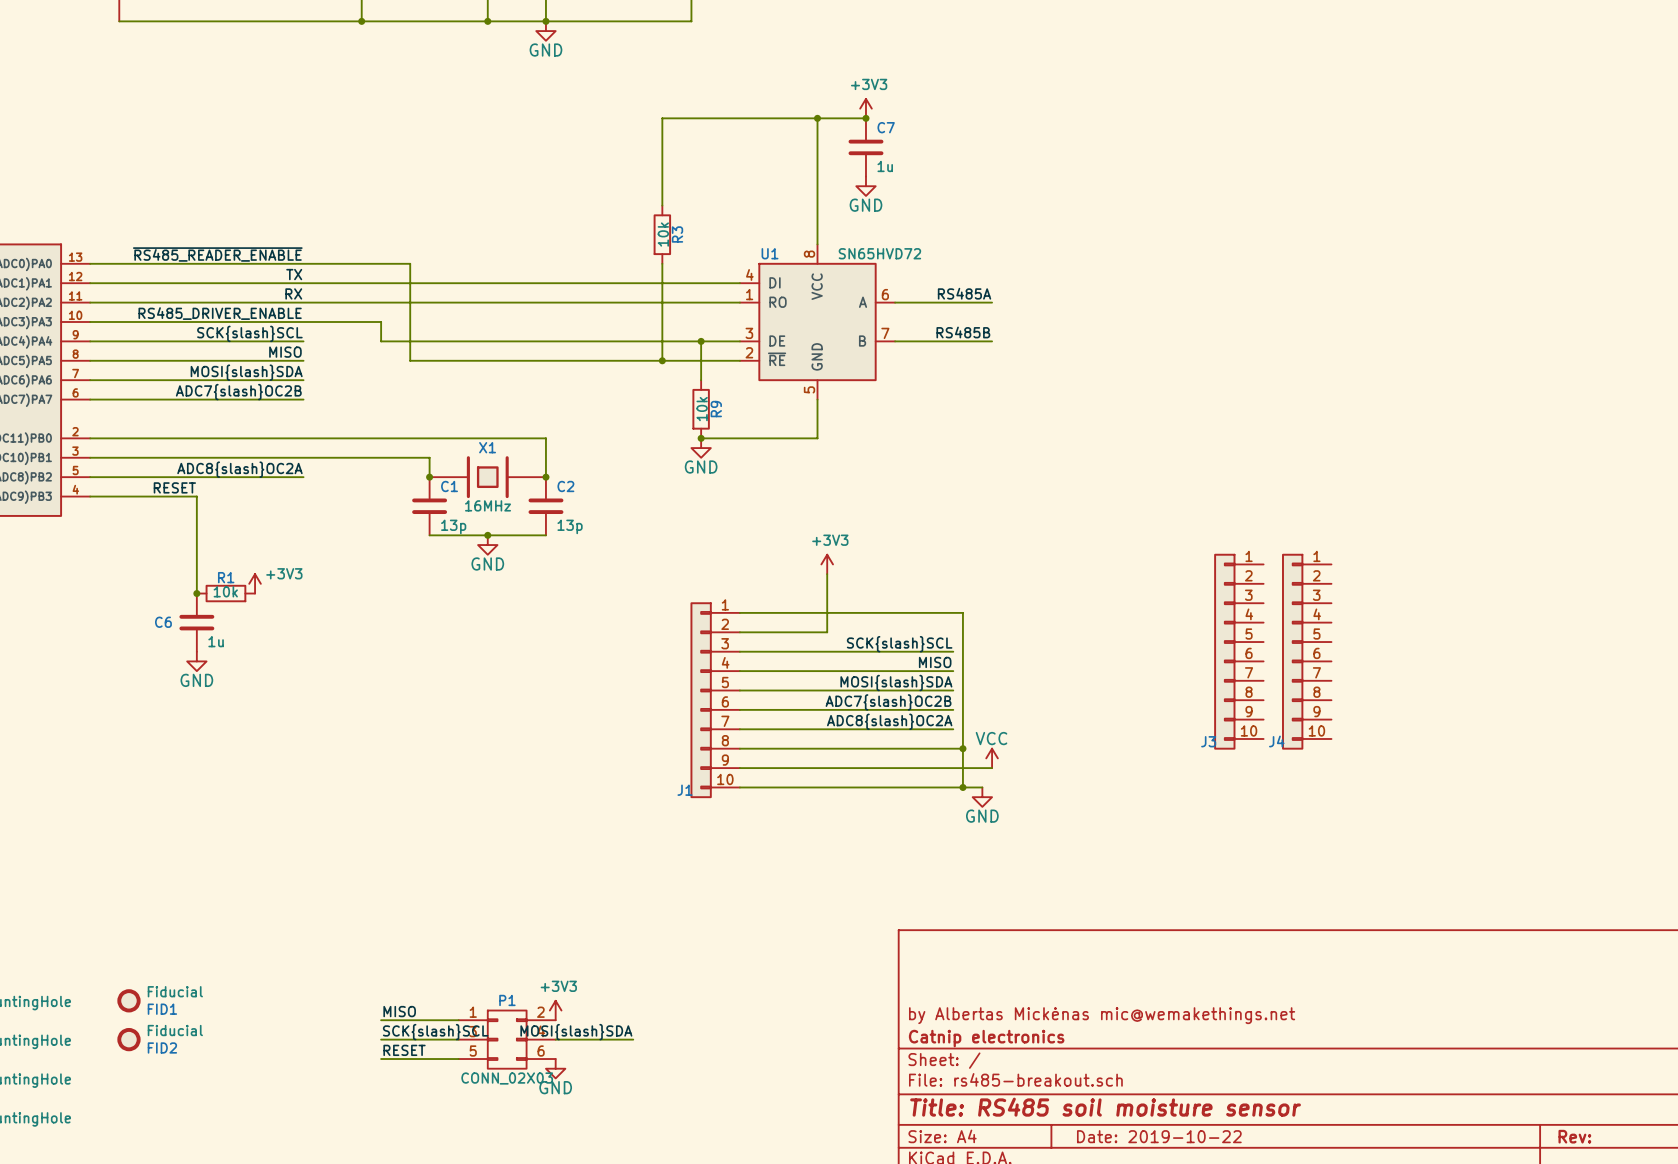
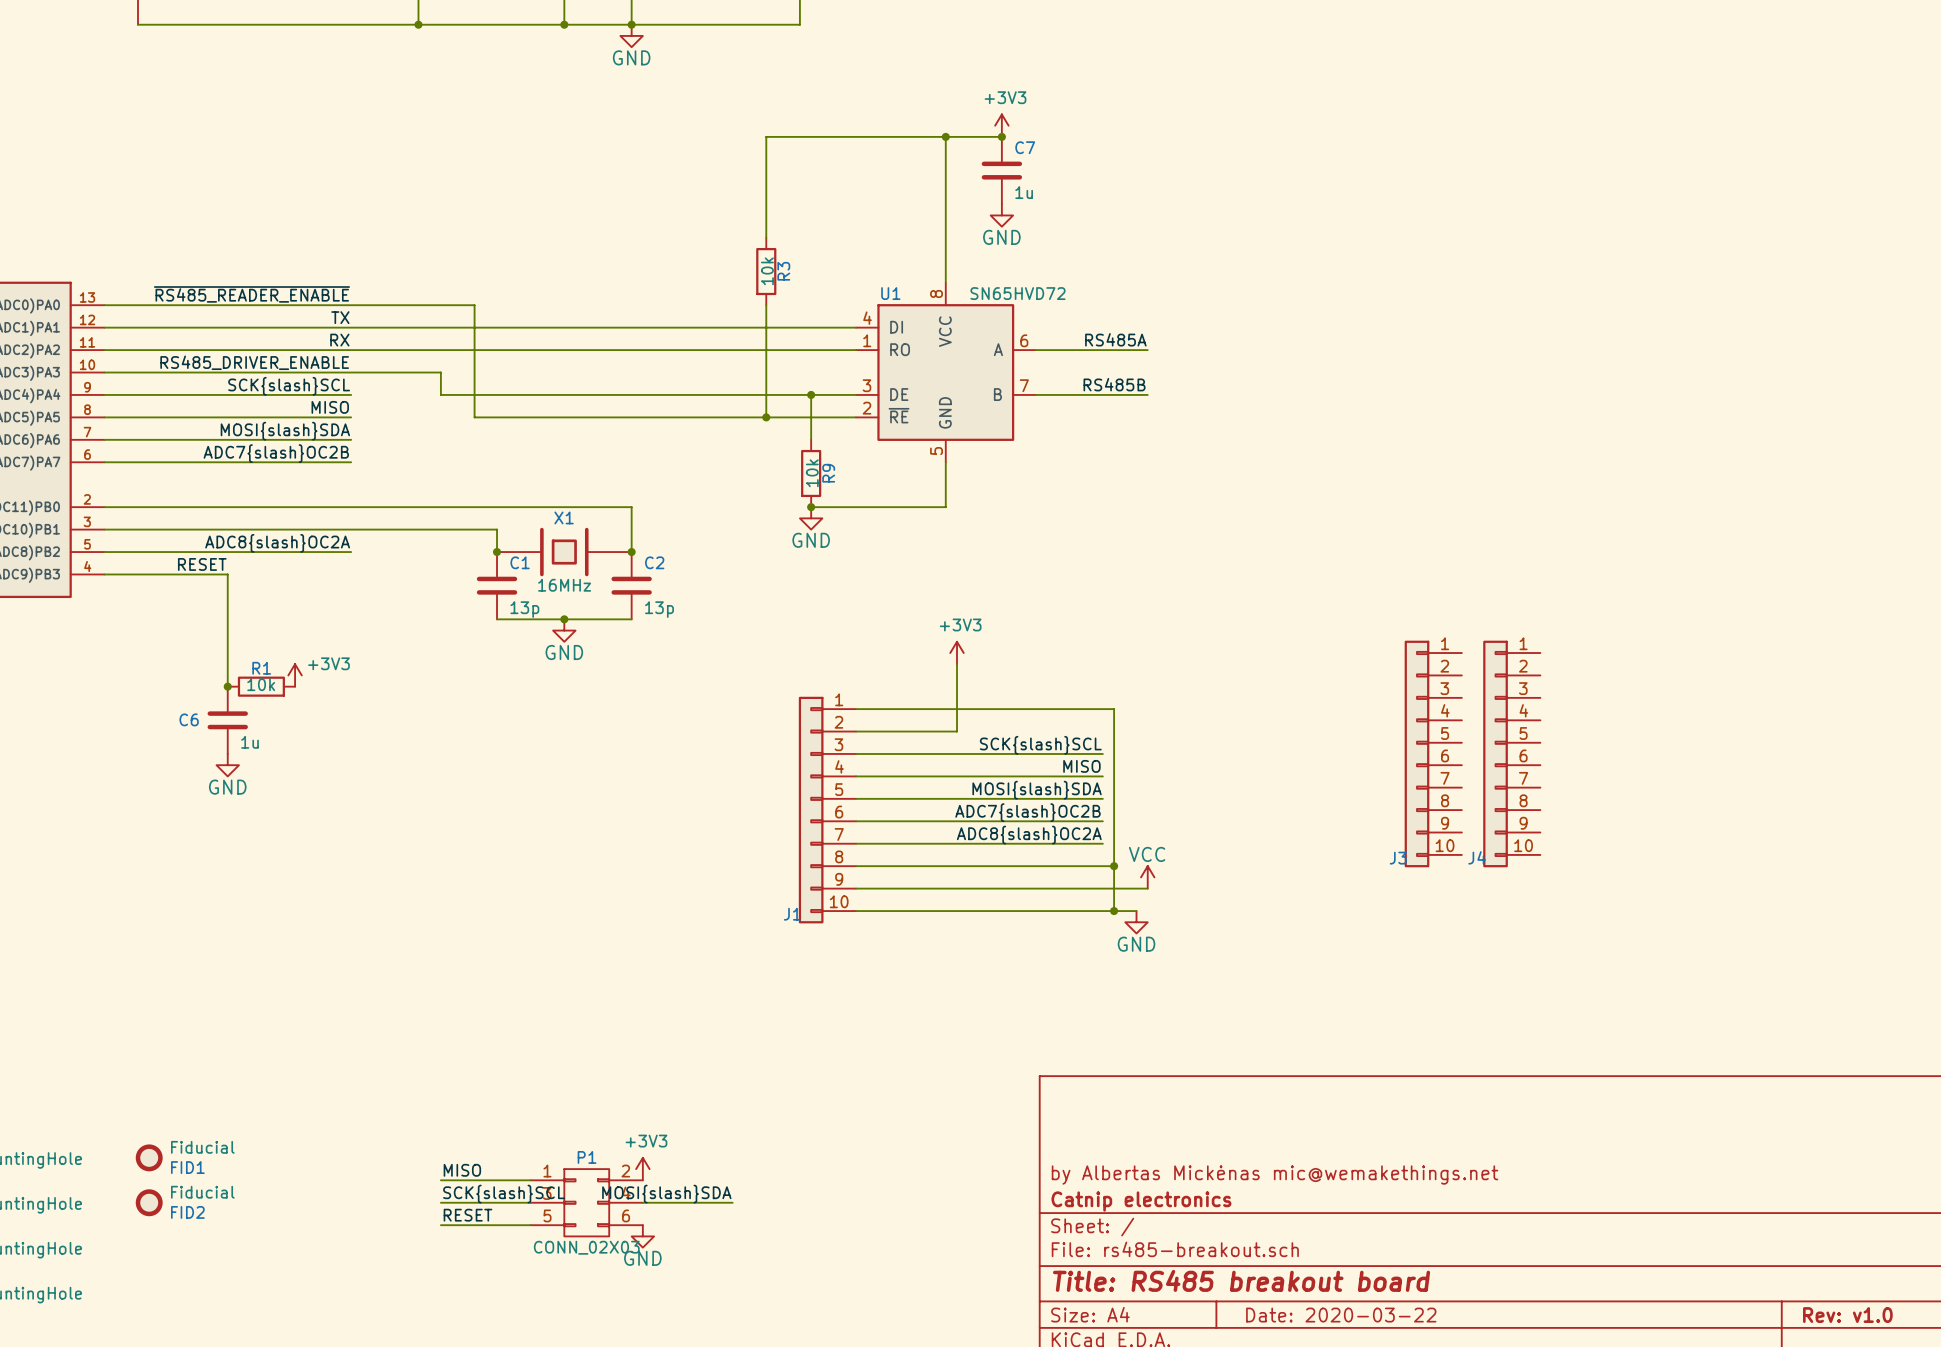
title block: Title: RS485 soil moisture sensor (1105, 1107) -> Title: RS485 breakout board (1241, 1280)
title block: Date: 2019-10-22 (1159, 1136) -> Date: 2020-03-22 (1341, 1315)
title block: Rev: (1574, 1136) -> Rev: v1.0 (1847, 1315)

